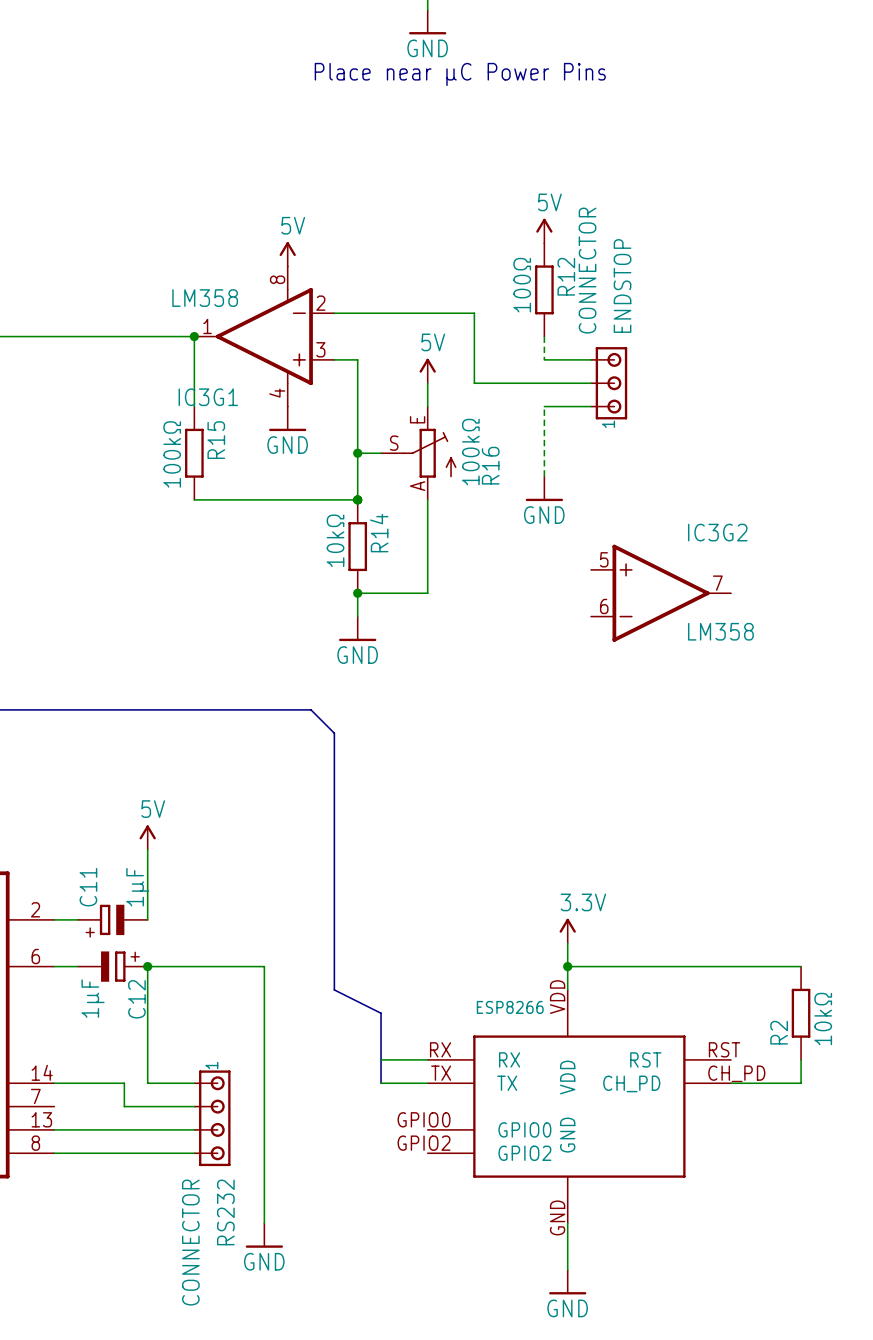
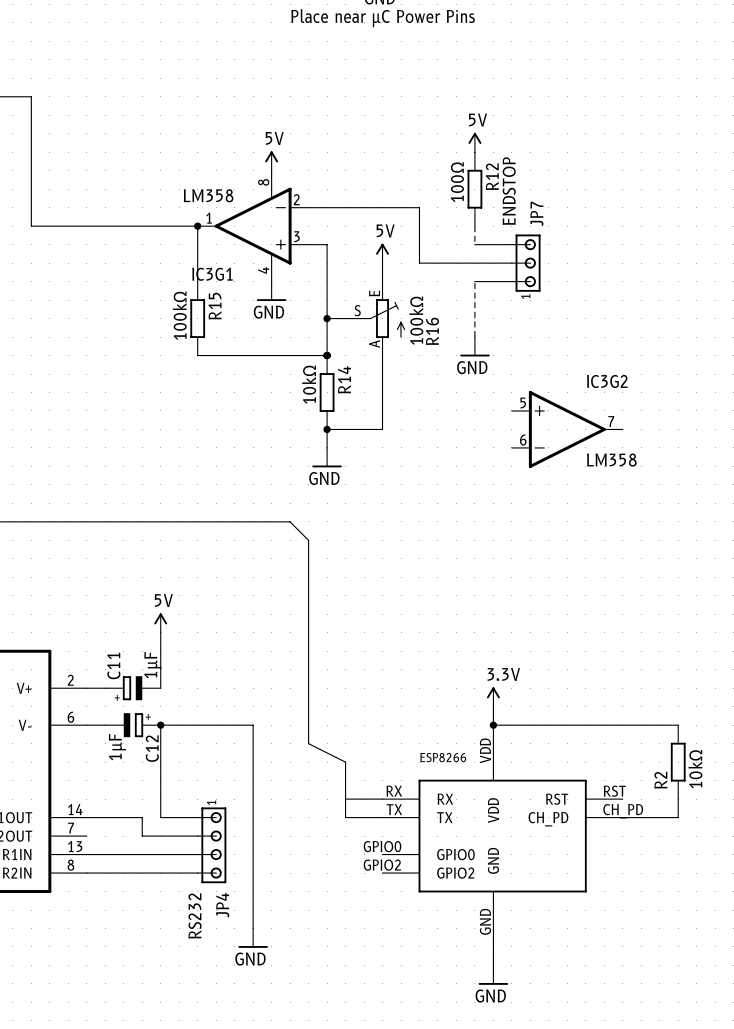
ENDSTOP value: CONNECTOR (587, 270) -> ENDSTOP (509, 191)
ENDSTOP name: ENDSTOP (622, 286) -> JP7 (536, 213)
RS232 name: RS232 (225, 1212) -> JP4 (222, 905)
RS232 value: CONNECTOR (190, 1242) -> RS232 (195, 915)

